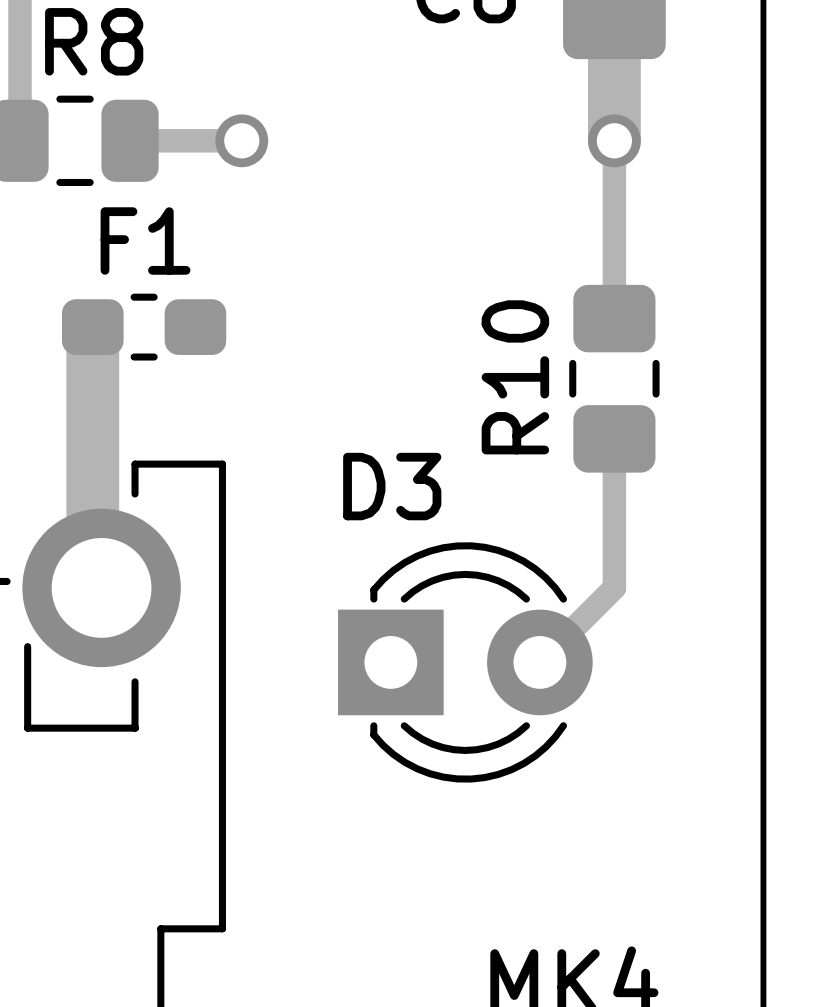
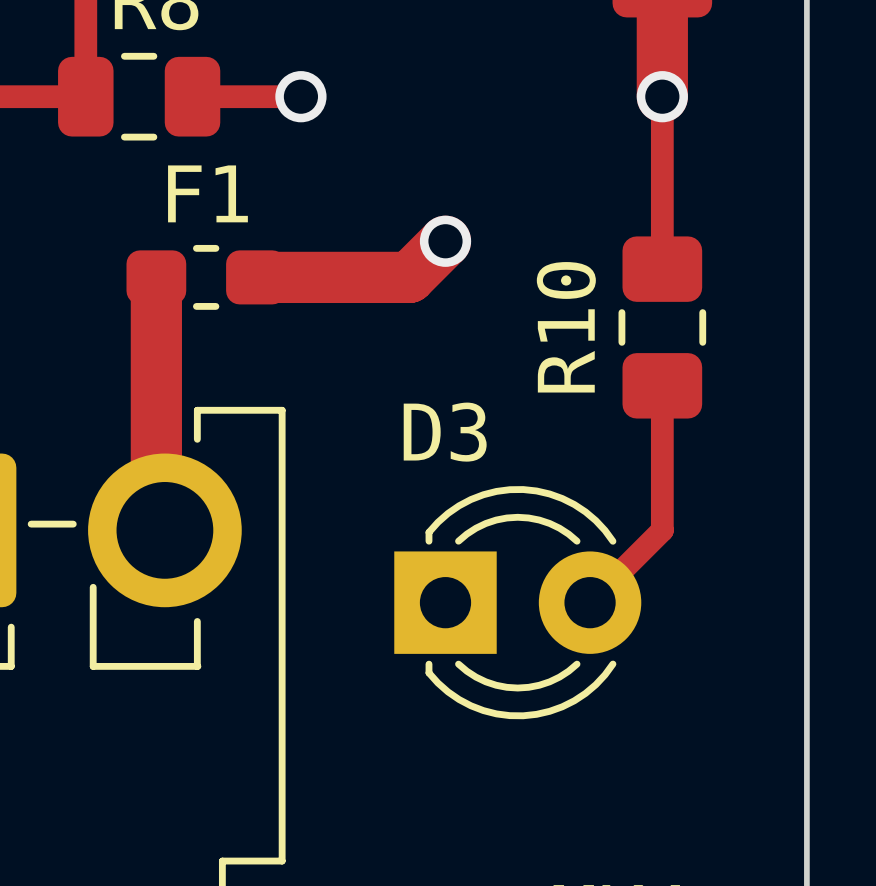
track: none -> (445, 241) (409, 277) (255, 277)
via: none -> (445, 241)

